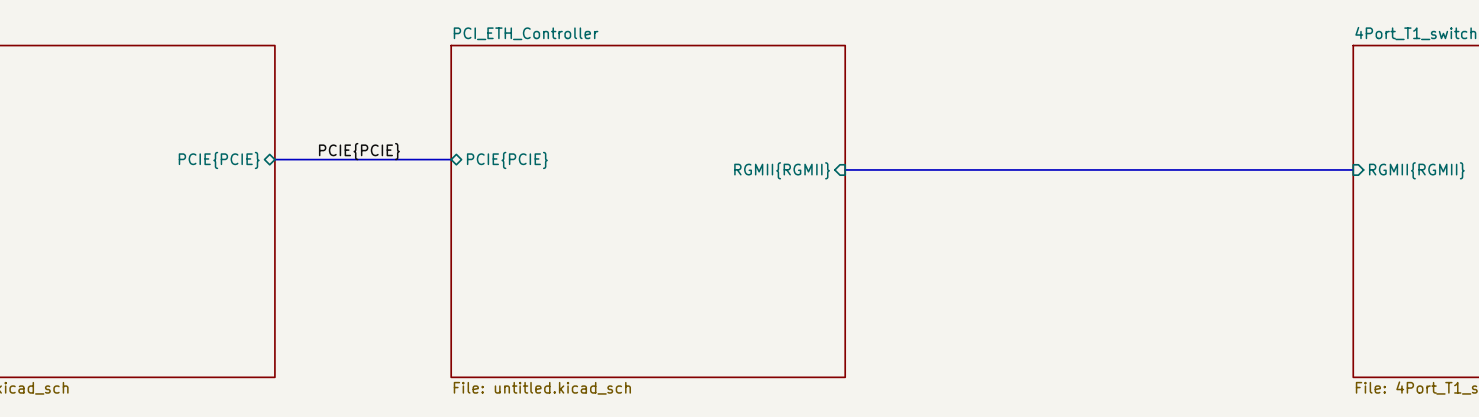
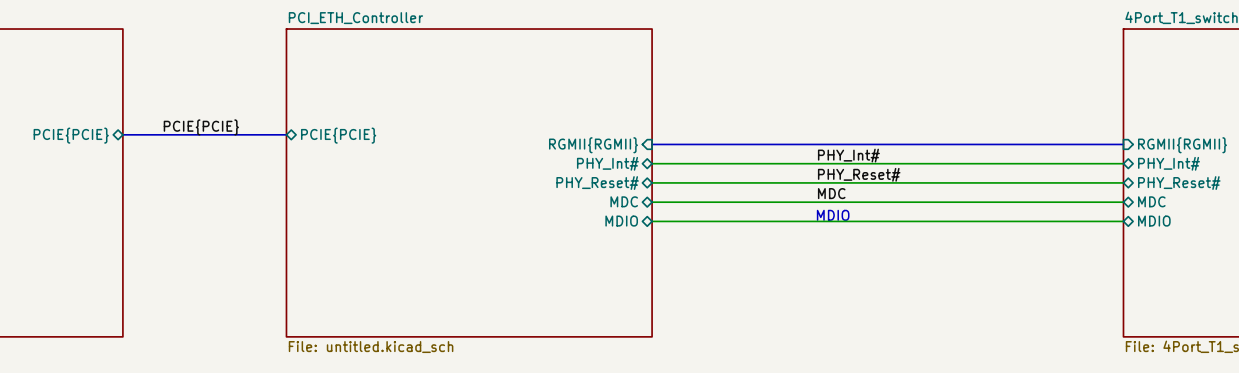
label: none -> PHY_Int# (848, 155)
sheet pin: none -> PHY_Int# (607, 163)
wire: none -> (652, 163) (1123, 163)
sheet pin: none -> PHY_Int# (1168, 163)
label: none -> PHY_Reset# (859, 174)
sheet pin: none -> PHY_Reset# (597, 183)
wire: none -> (652, 182) (1123, 182)
sheet pin: none -> PHY_Reset# (1179, 183)
label: none -> MDC (831, 193)
sheet pin: none -> MDC (624, 201)
sheet pin: none -> MDC (1151, 201)
wire: none -> (652, 202) (1123, 202)
text: none -> MDIO (833, 215)
sheet pin: none -> MDIO (621, 221)
wire: none -> (652, 221) (1123, 221)
sheet pin: none -> MDIO (1154, 221)

